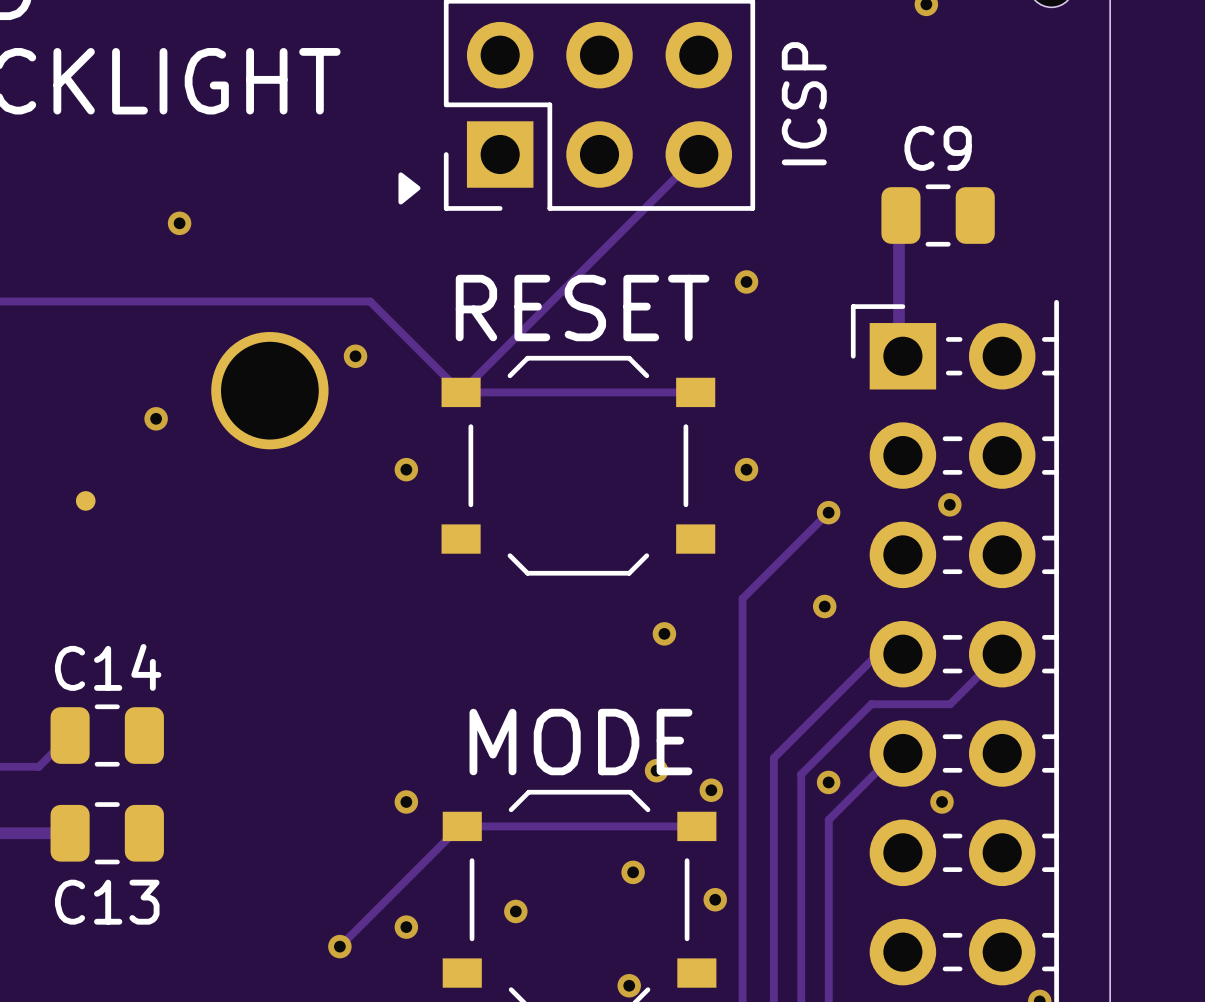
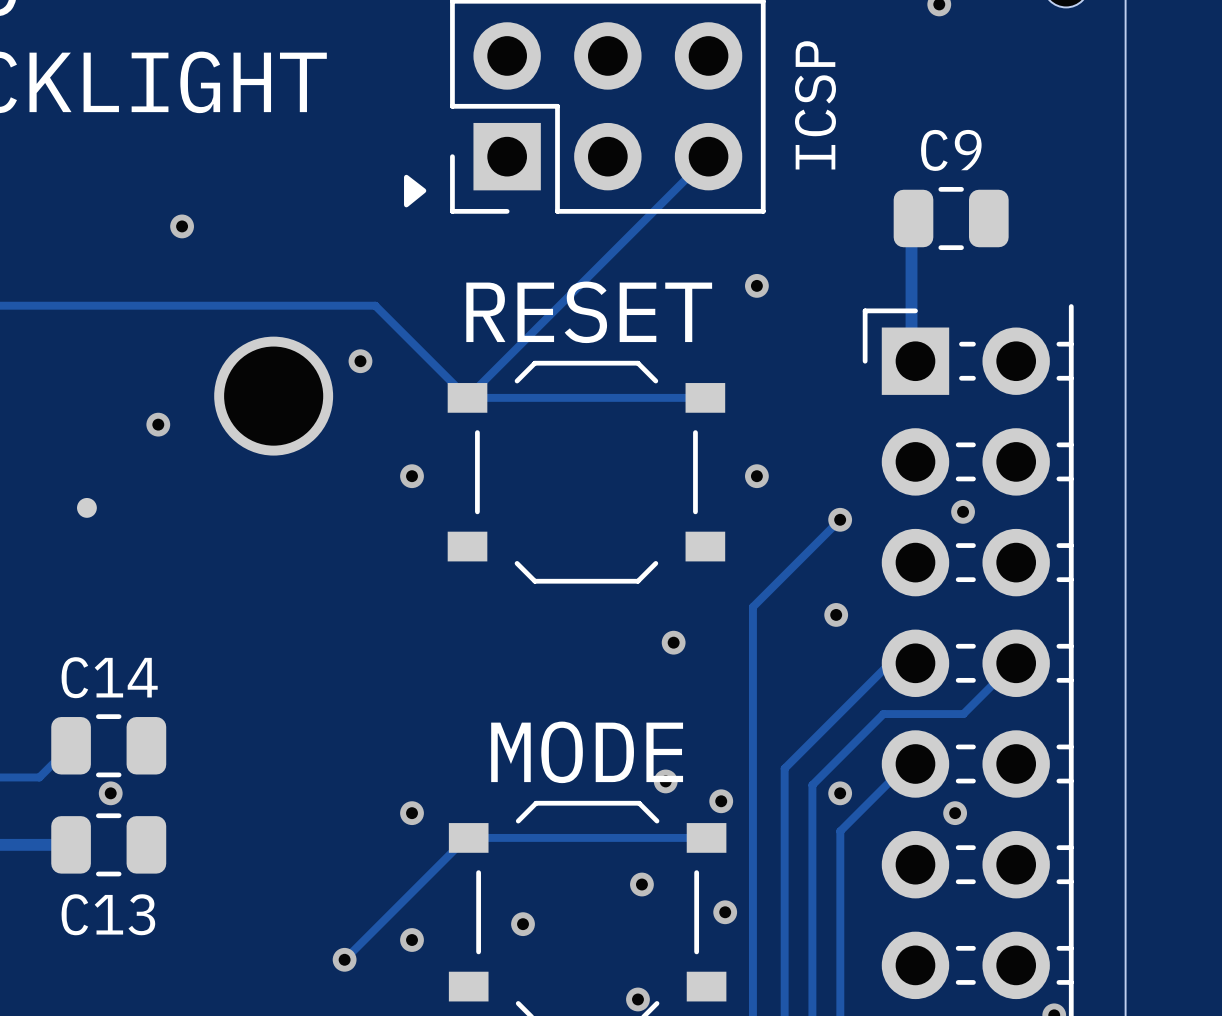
via: none -> (110, 793)

